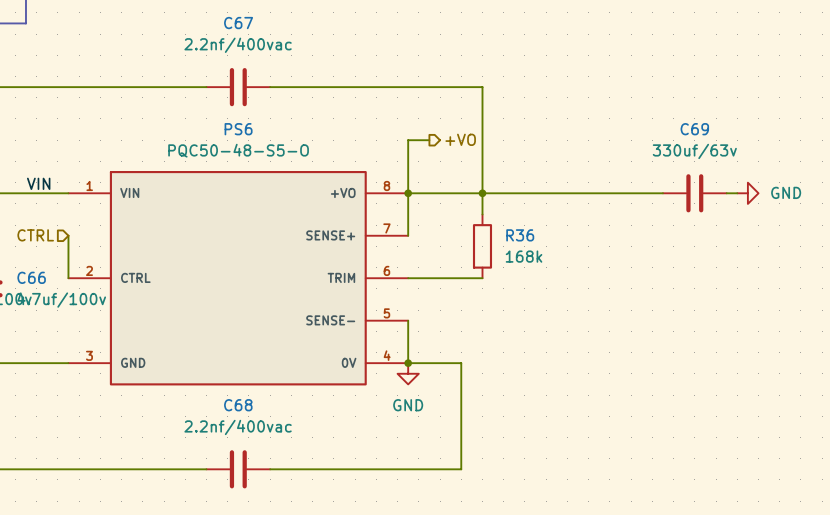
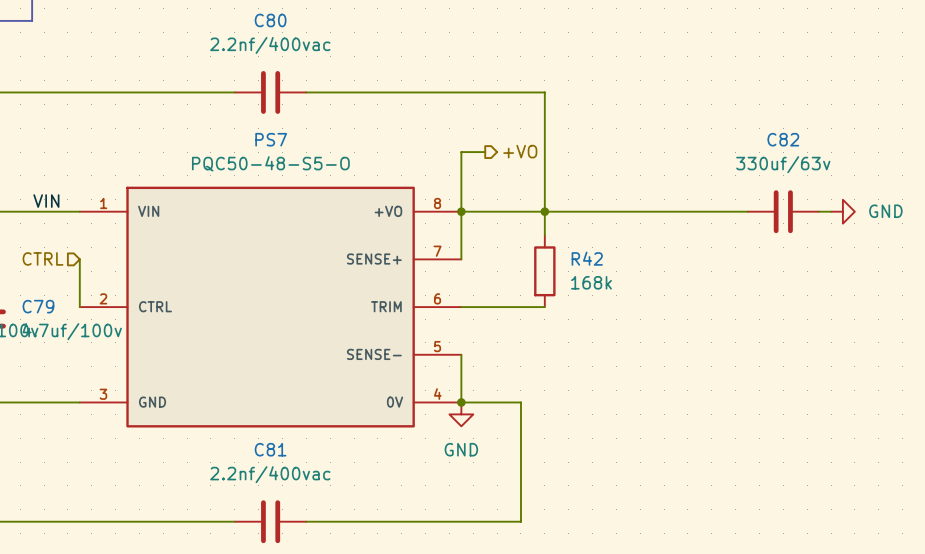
C67 name: C67 (238, 23) -> C80 (270, 20)
PS6 name: PS6 (238, 129) -> PS7 (271, 139)
C69 name: C69 (694, 129) -> C82 (783, 139)
R36 name: R36 (520, 235) -> R42 (587, 258)
C66 name: C66 (31, 277) -> C79 (38, 306)
C68 name: C68 (238, 405) -> C81 (270, 449)

